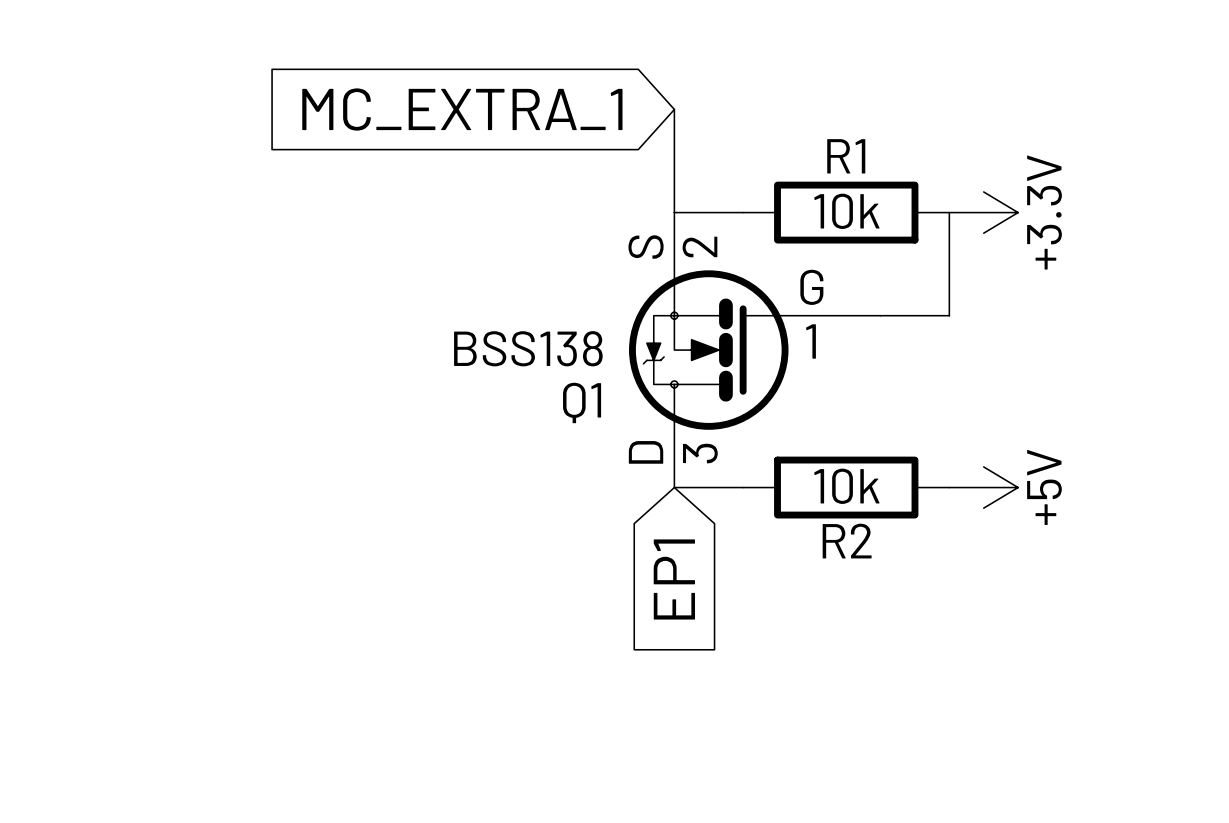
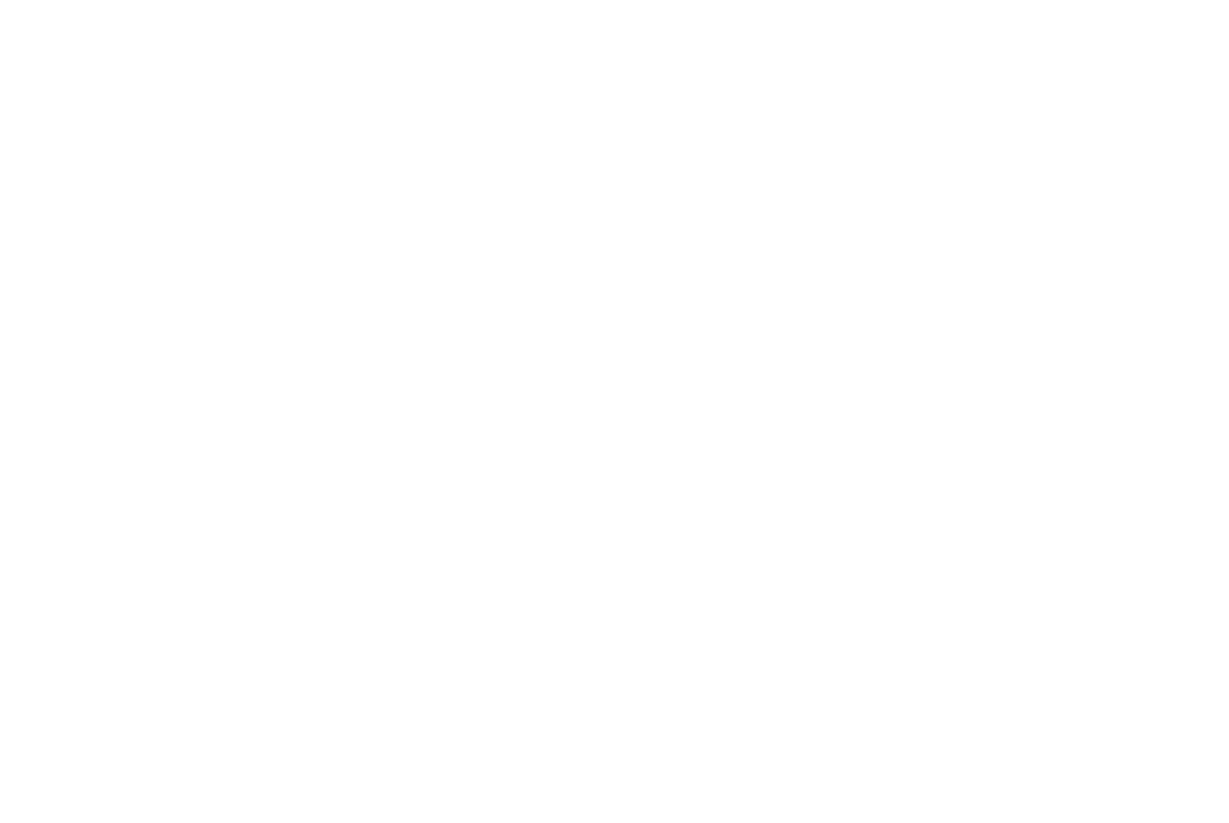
global label: MC_EXTRA_1 (462, 109) -> none
wire: (674, 109) (674, 212) (743, 212) -> none
R1: 10k (846, 212) -> none
wire: (949, 212) (949, 315) (880, 315) -> none
power symbol: +3.3V (983, 212) -> none
Q1: BSS138 (754, 350) -> none
wire: (674, 487) (743, 487) -> none
R2: 10k (846, 487) -> none
power symbol: +5V (983, 487) -> none
global label: EP1 (674, 579) -> none

